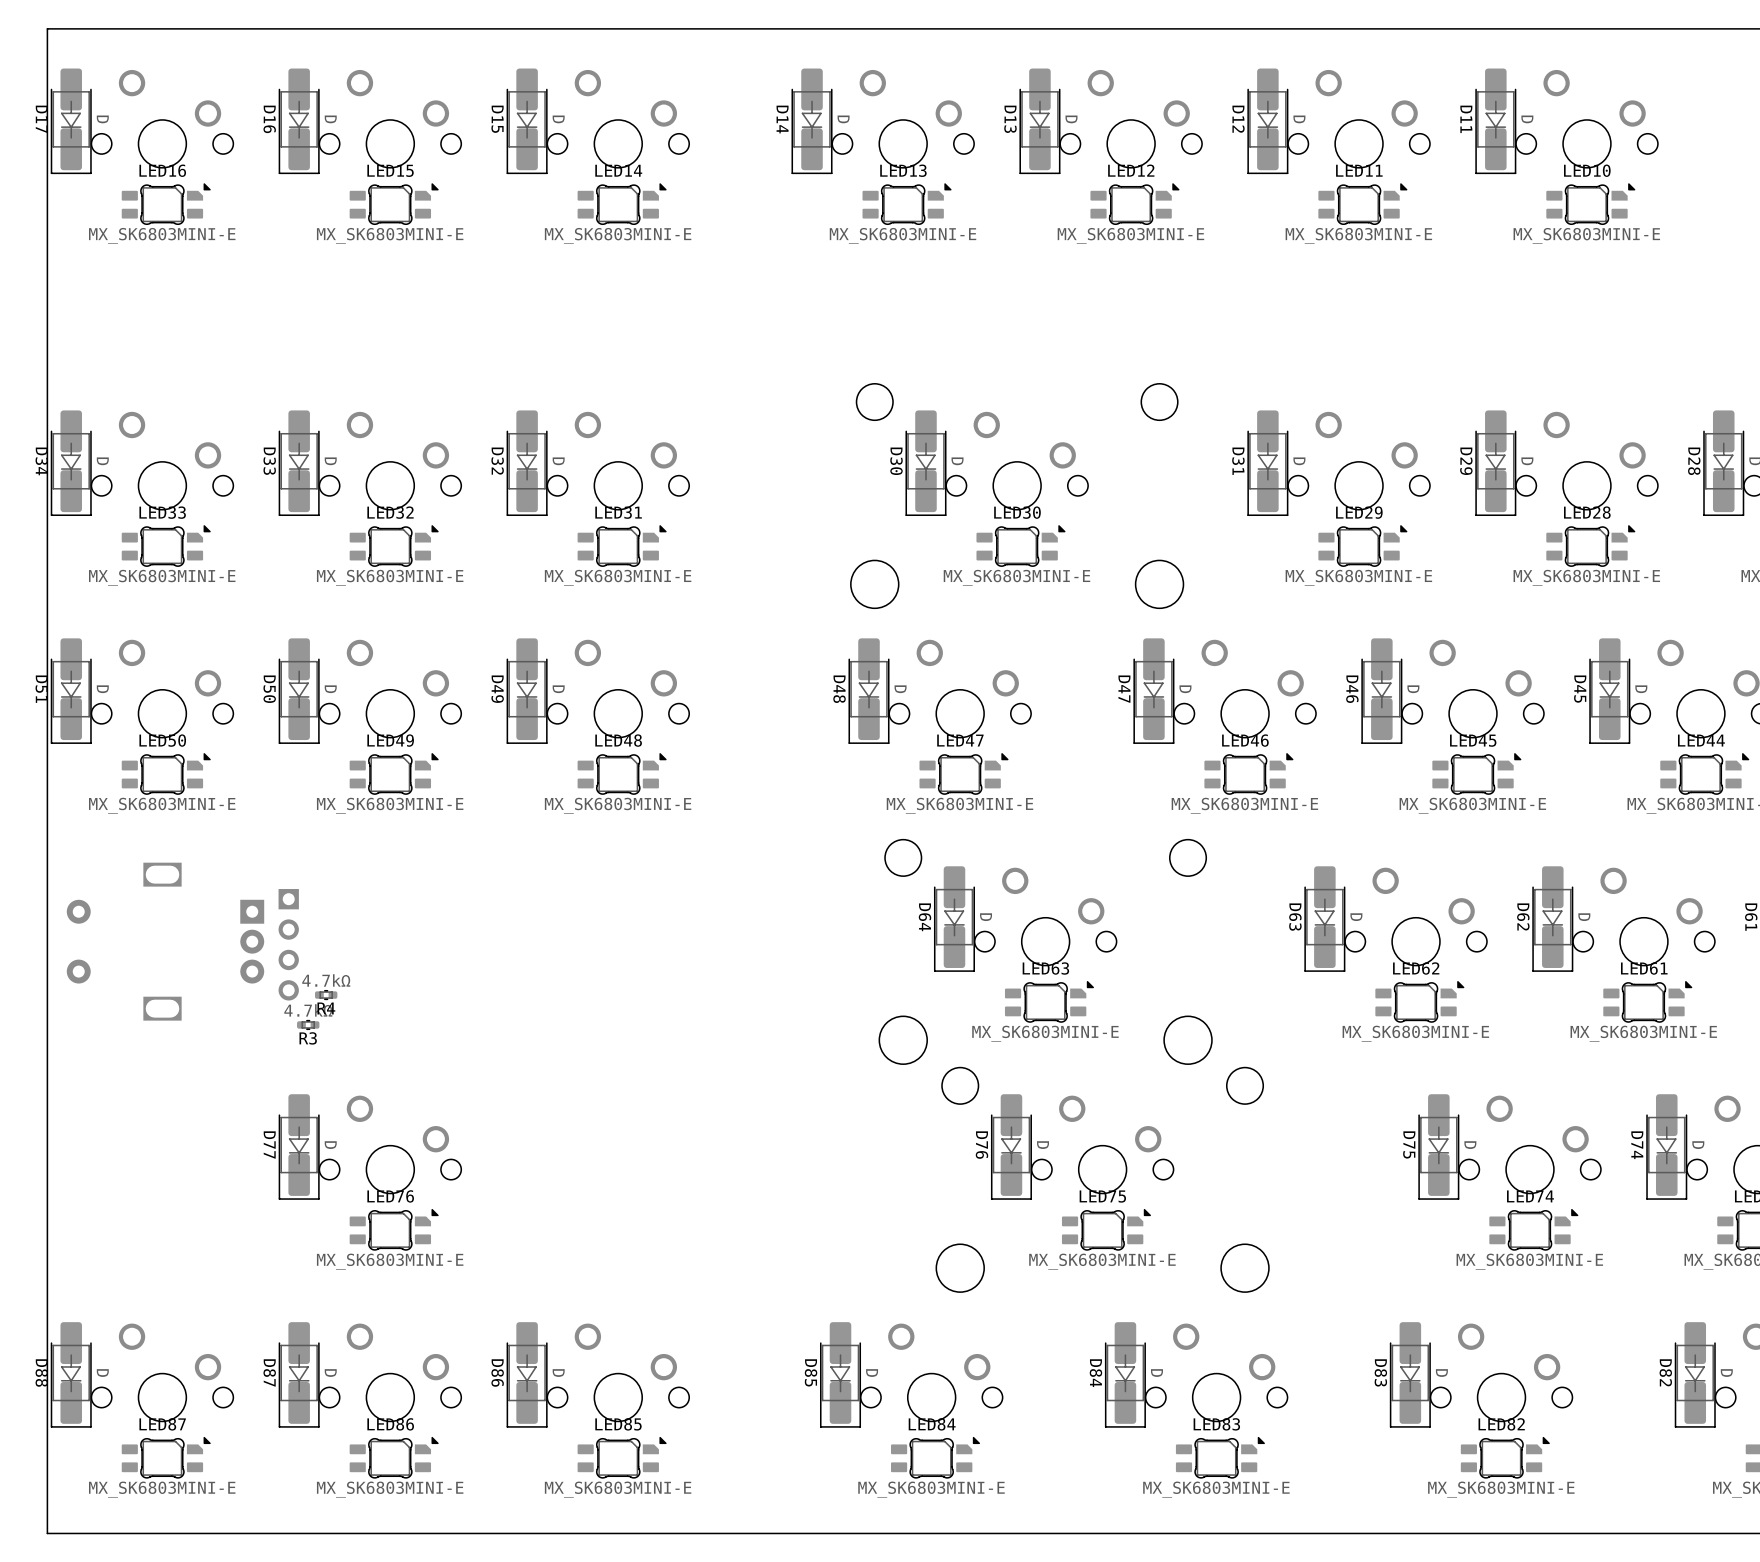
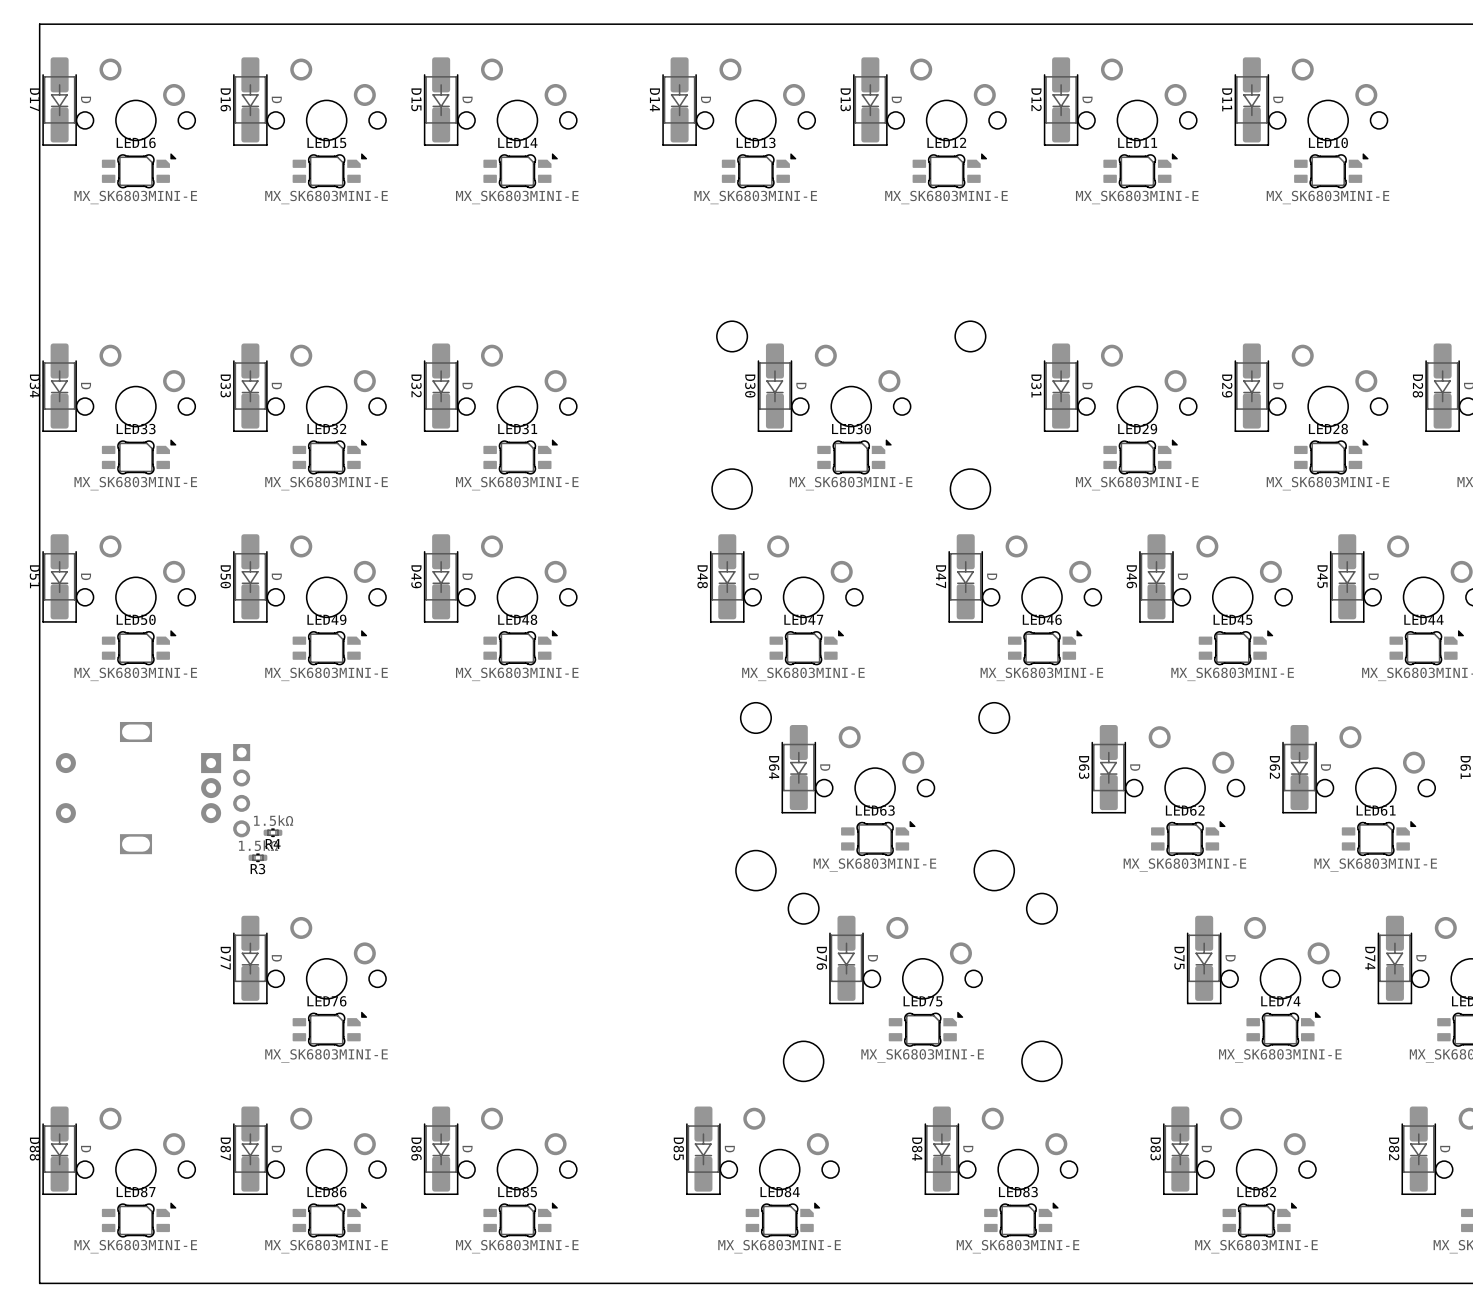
R4 value: 4.7kΩ (326, 980) -> 1.5kΩ (273, 820)
R3 value: 4.7kΩ (308, 1010) -> 1.5kΩ (258, 845)

